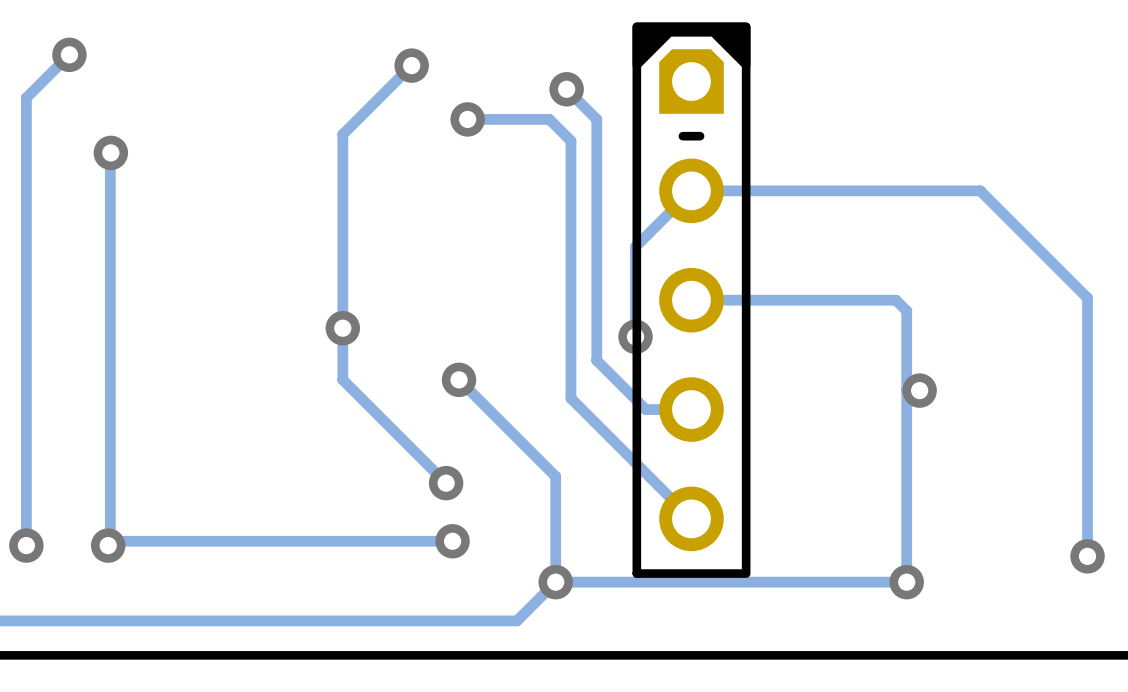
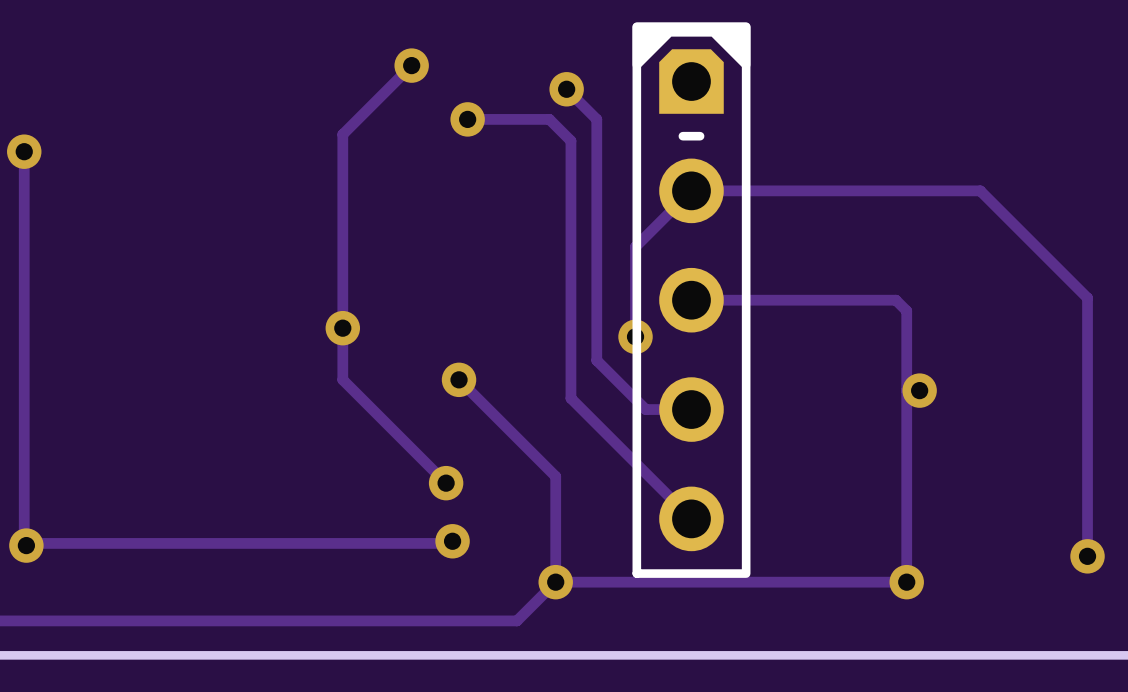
track: (69, 54) (26, 97) (26, 545) -> none
via: (69, 54) -> none
via: none -> (24, 151)
via: (110, 152) -> none
track: (110, 153) (110, 543) -> none
track: (452, 541) (112, 541) (108, 545) -> (452, 541) (450, 543) (24, 543) (24, 151)
via: (108, 545) -> none

